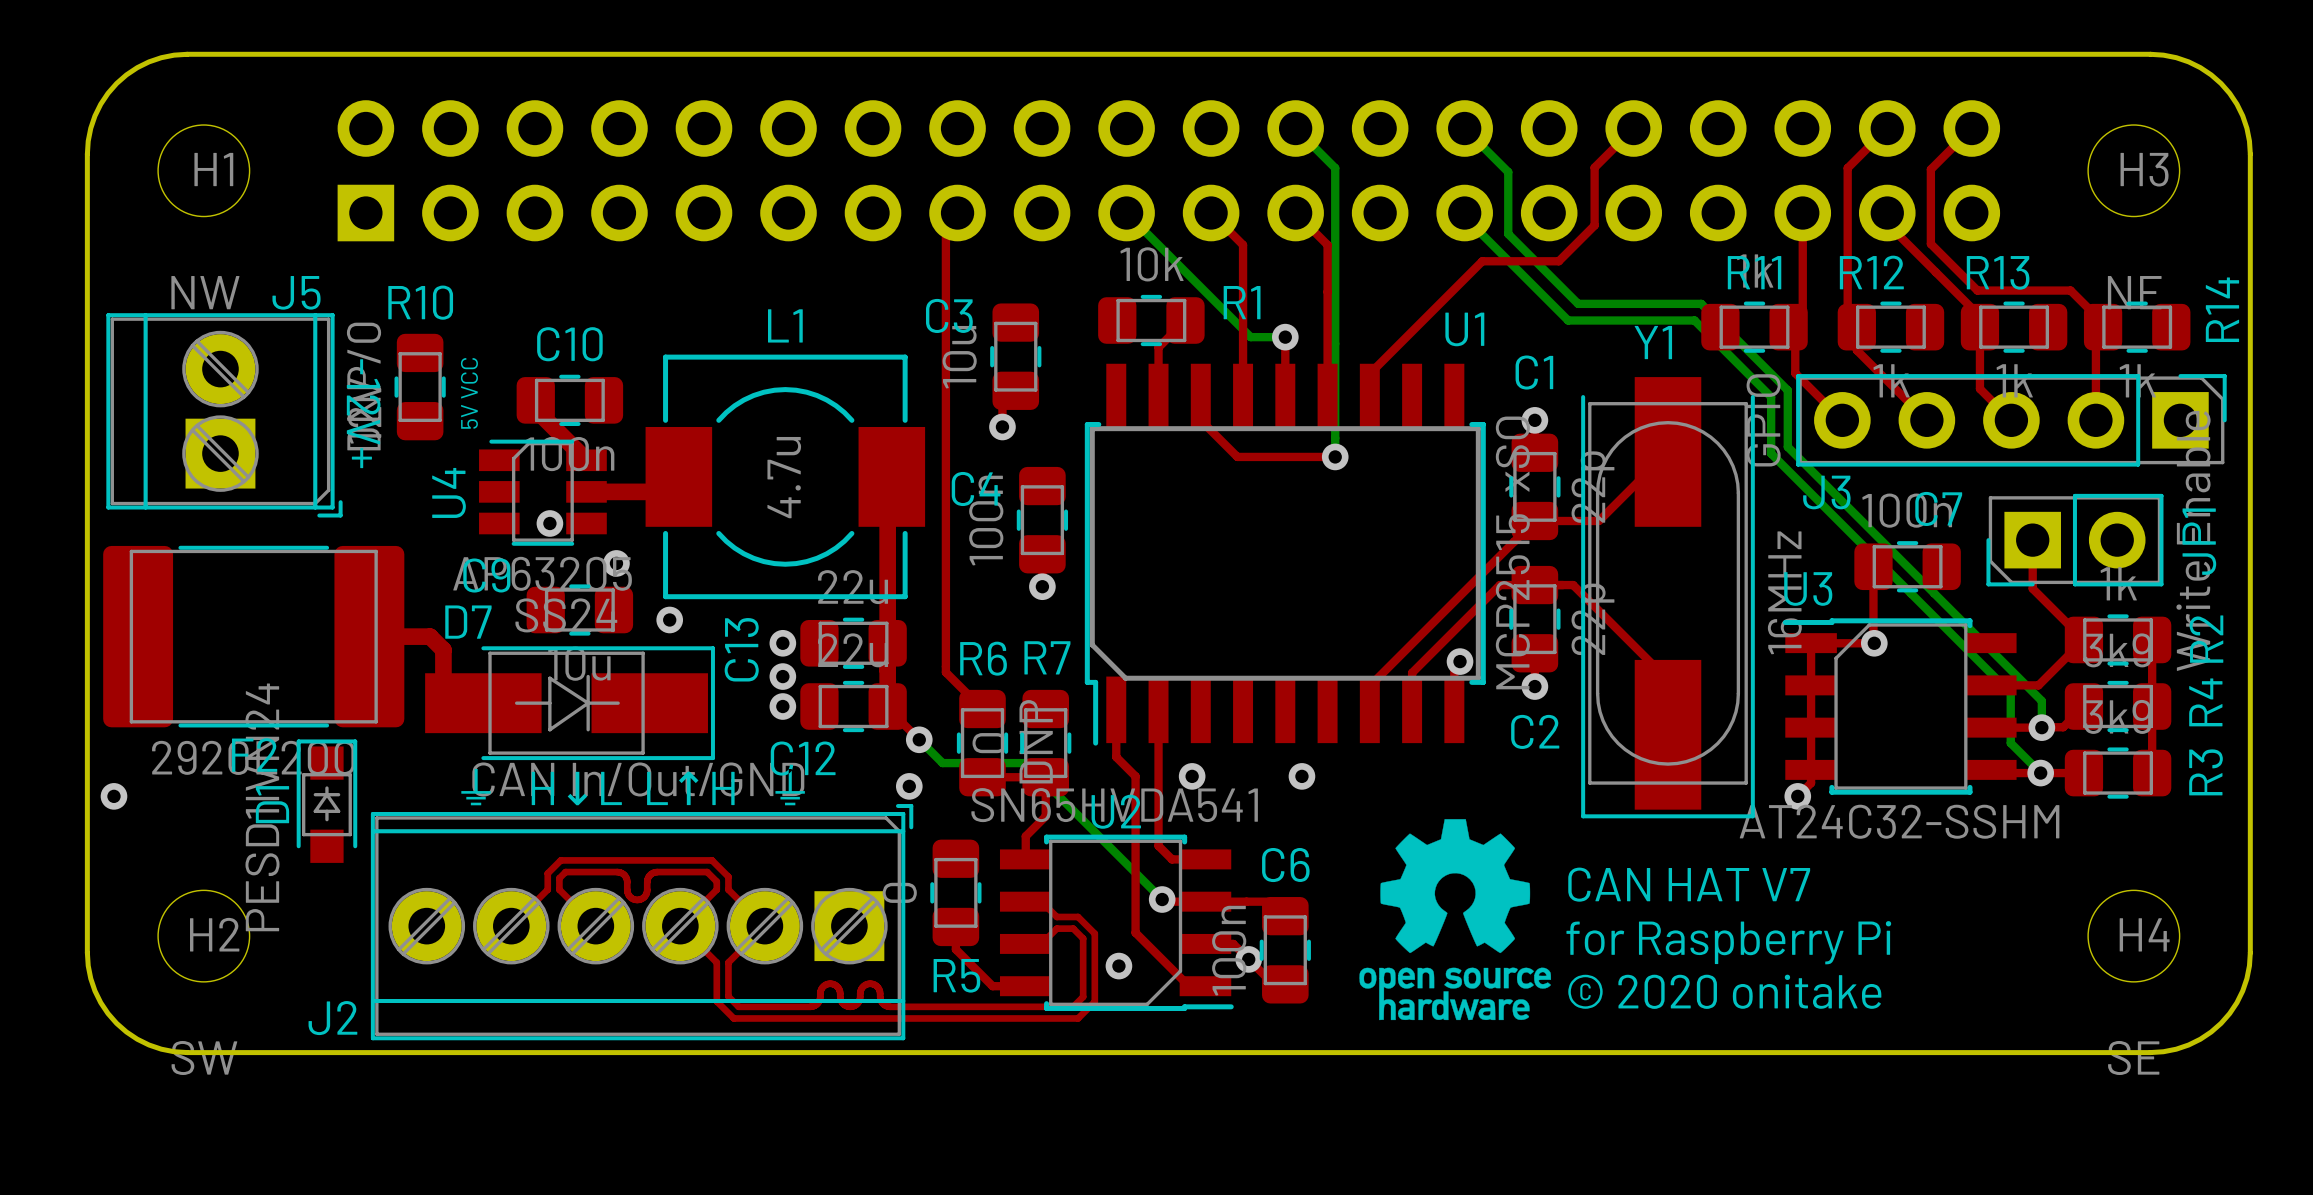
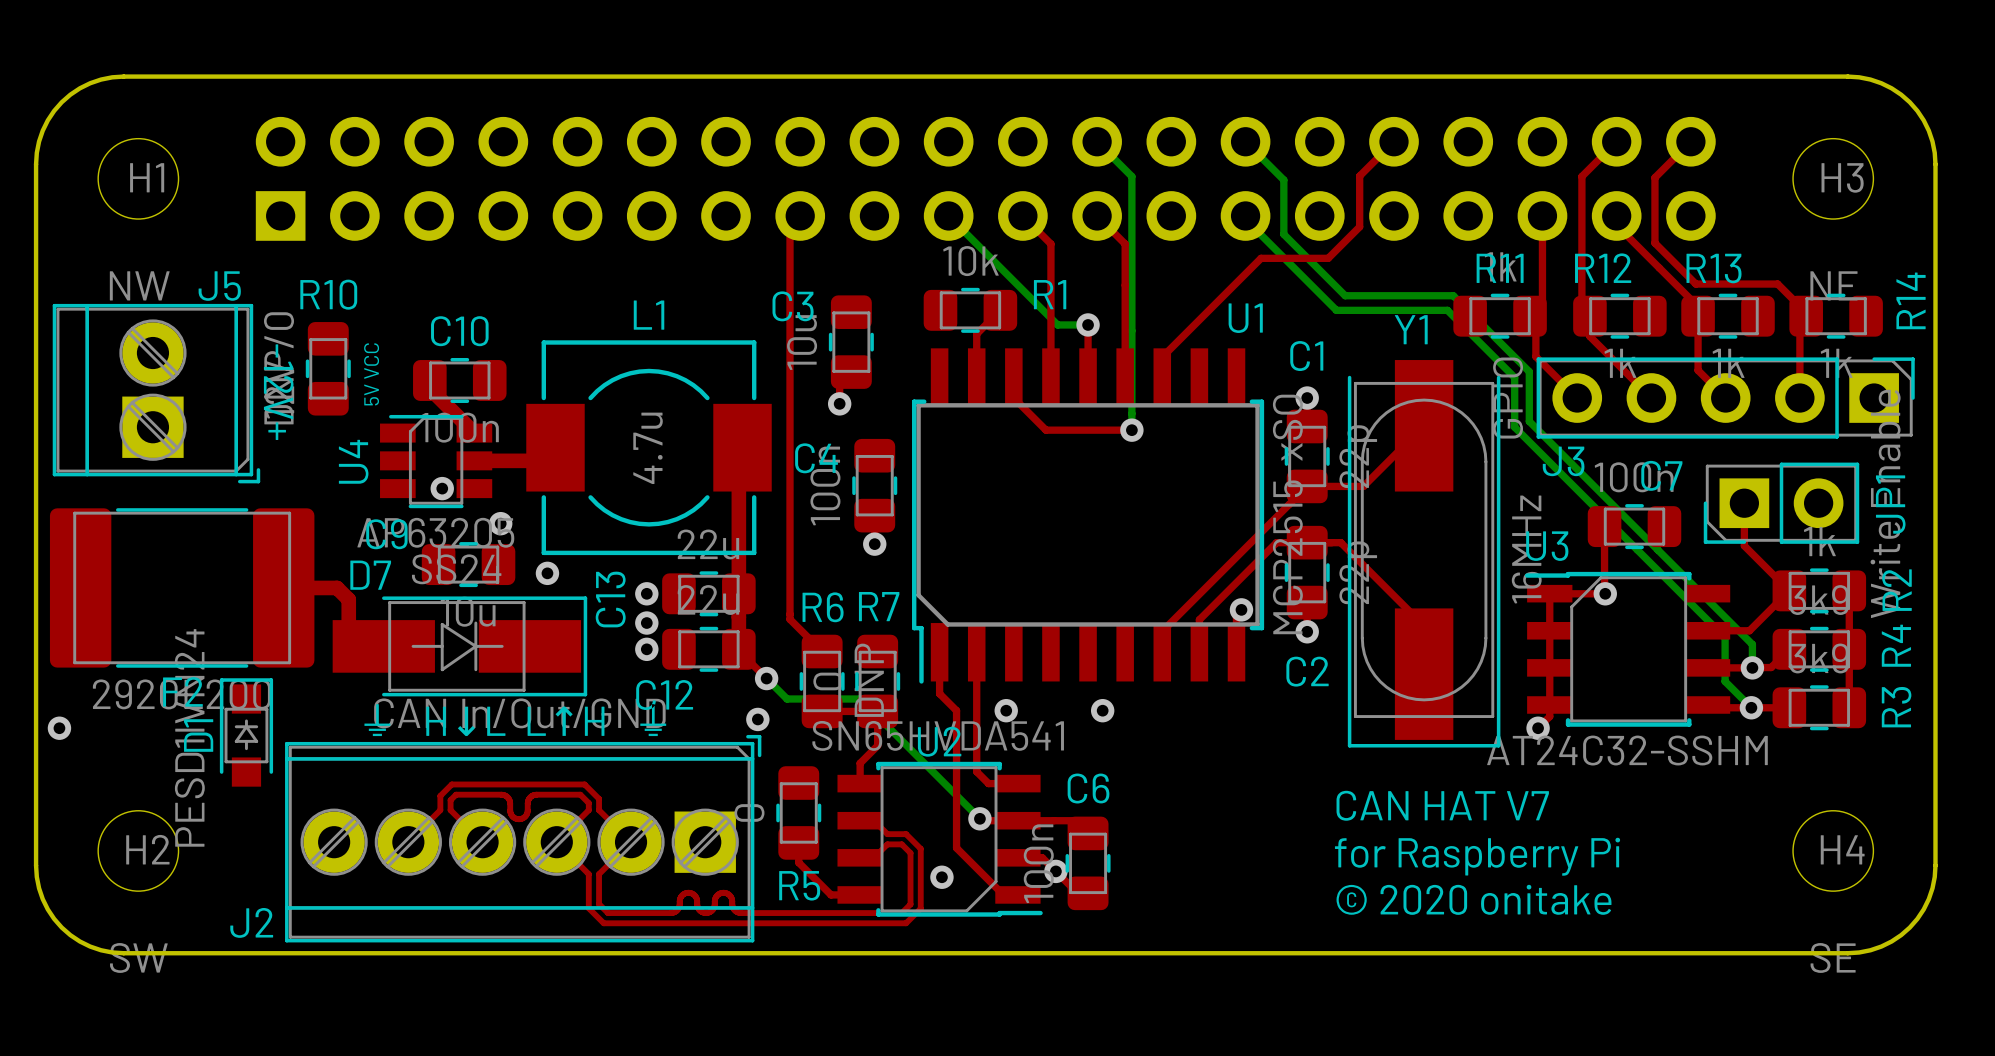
drawing: [1359, 819, 1552, 1021] -> none

